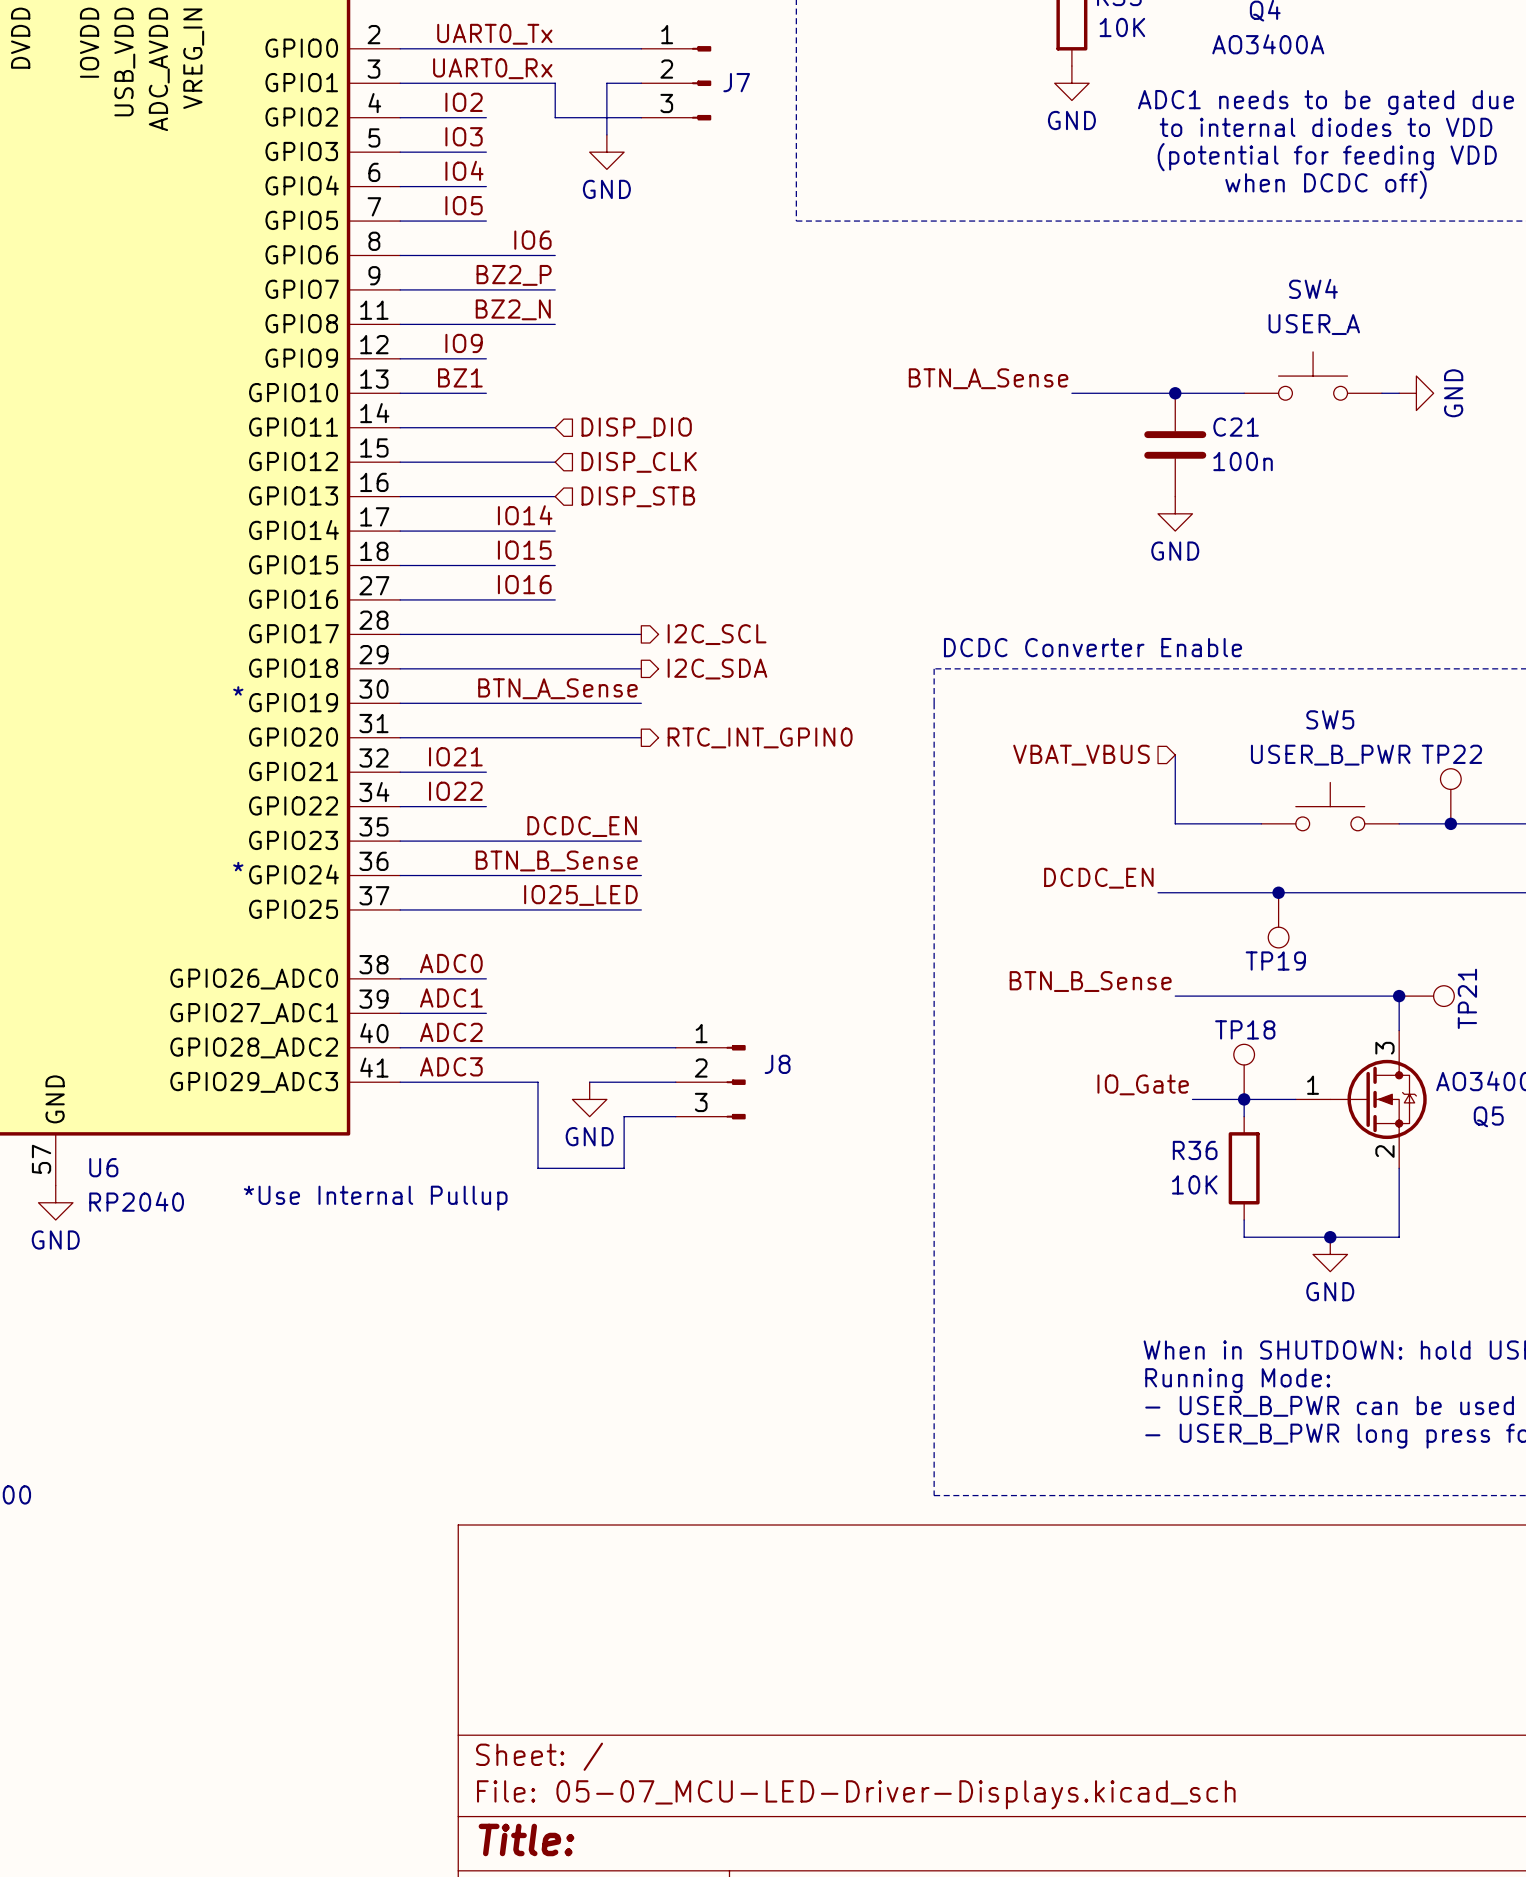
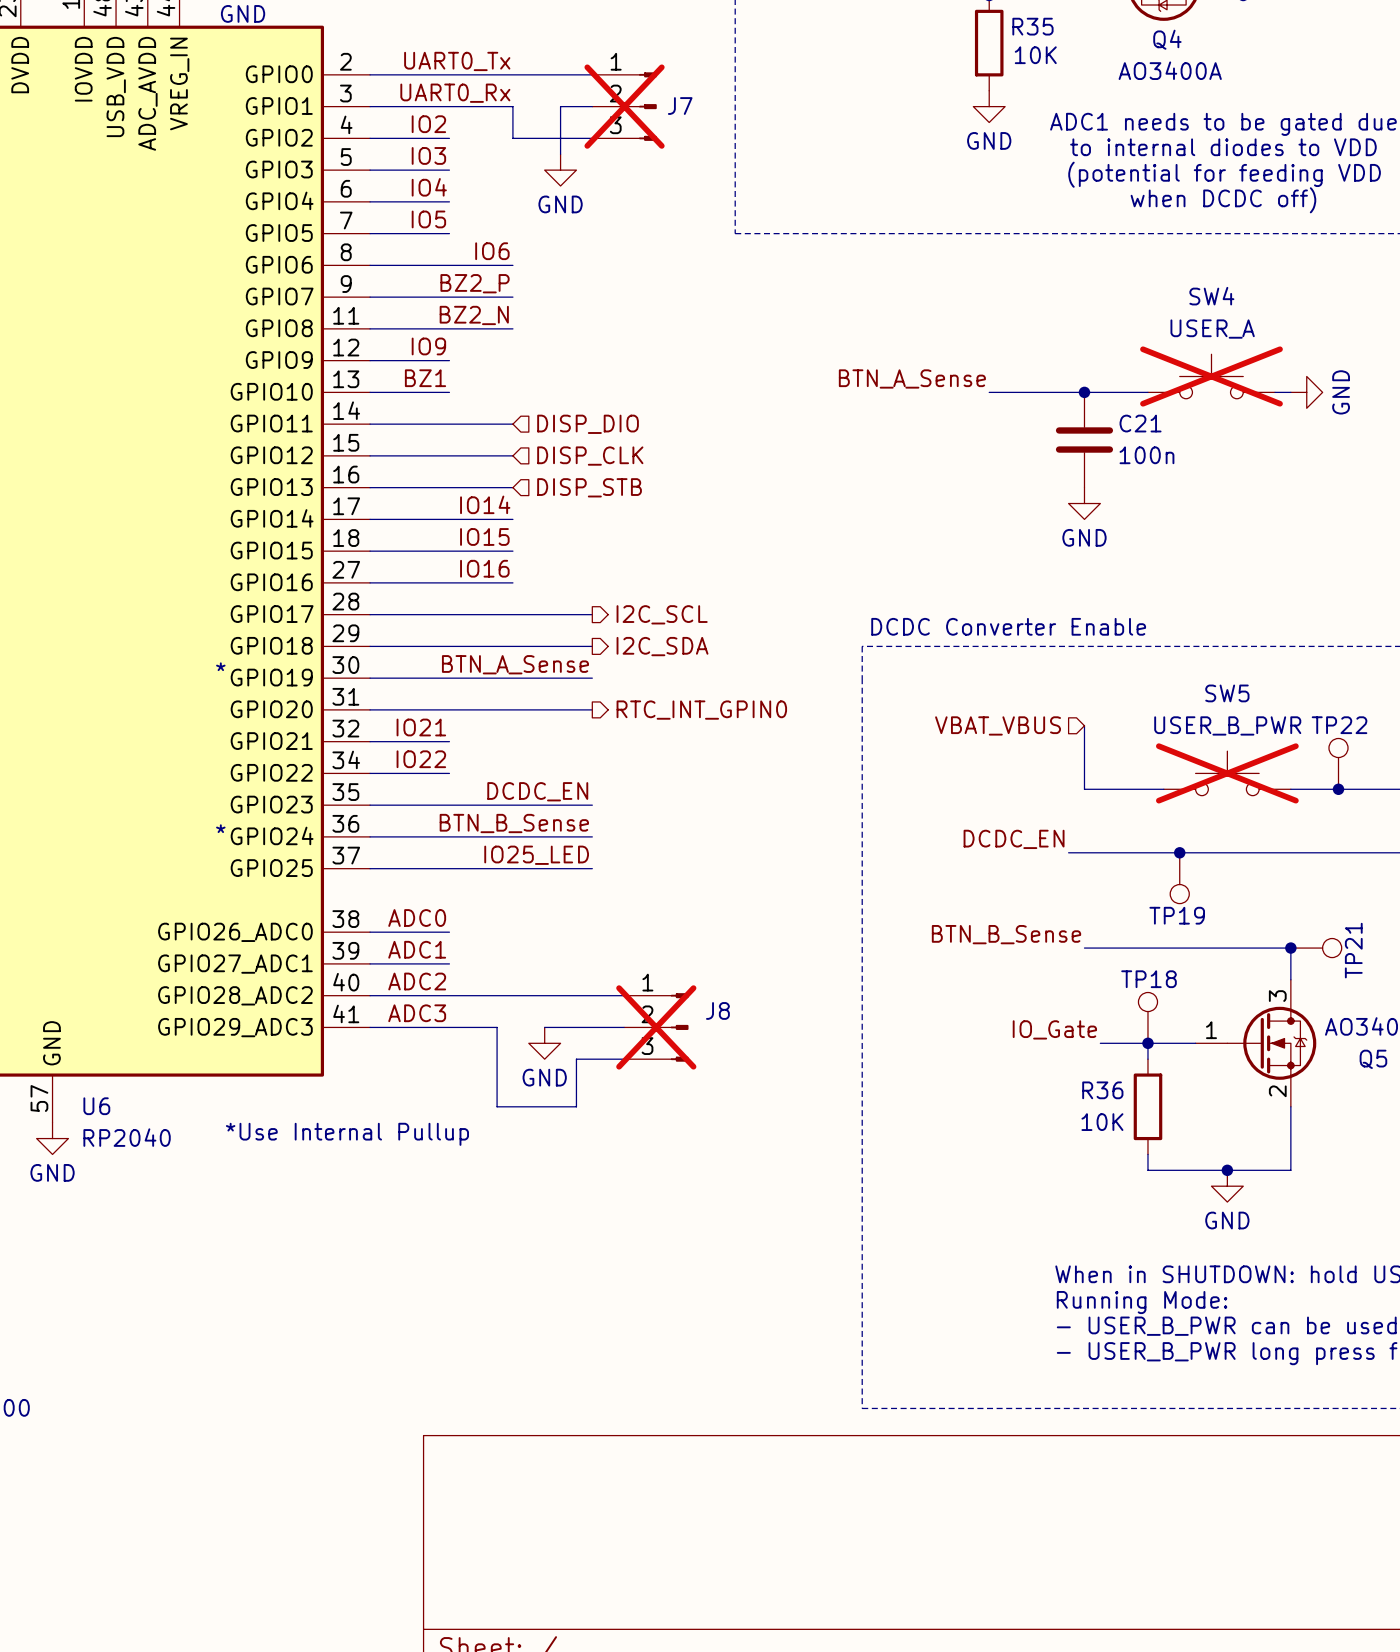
J7 do-not-place cross: none -> (624, 106)
SW4 do-not-place cross: none -> (1211, 376)
SW5 do-not-place cross: none -> (1227, 773)
J8 do-not-place cross: none -> (656, 1027)

